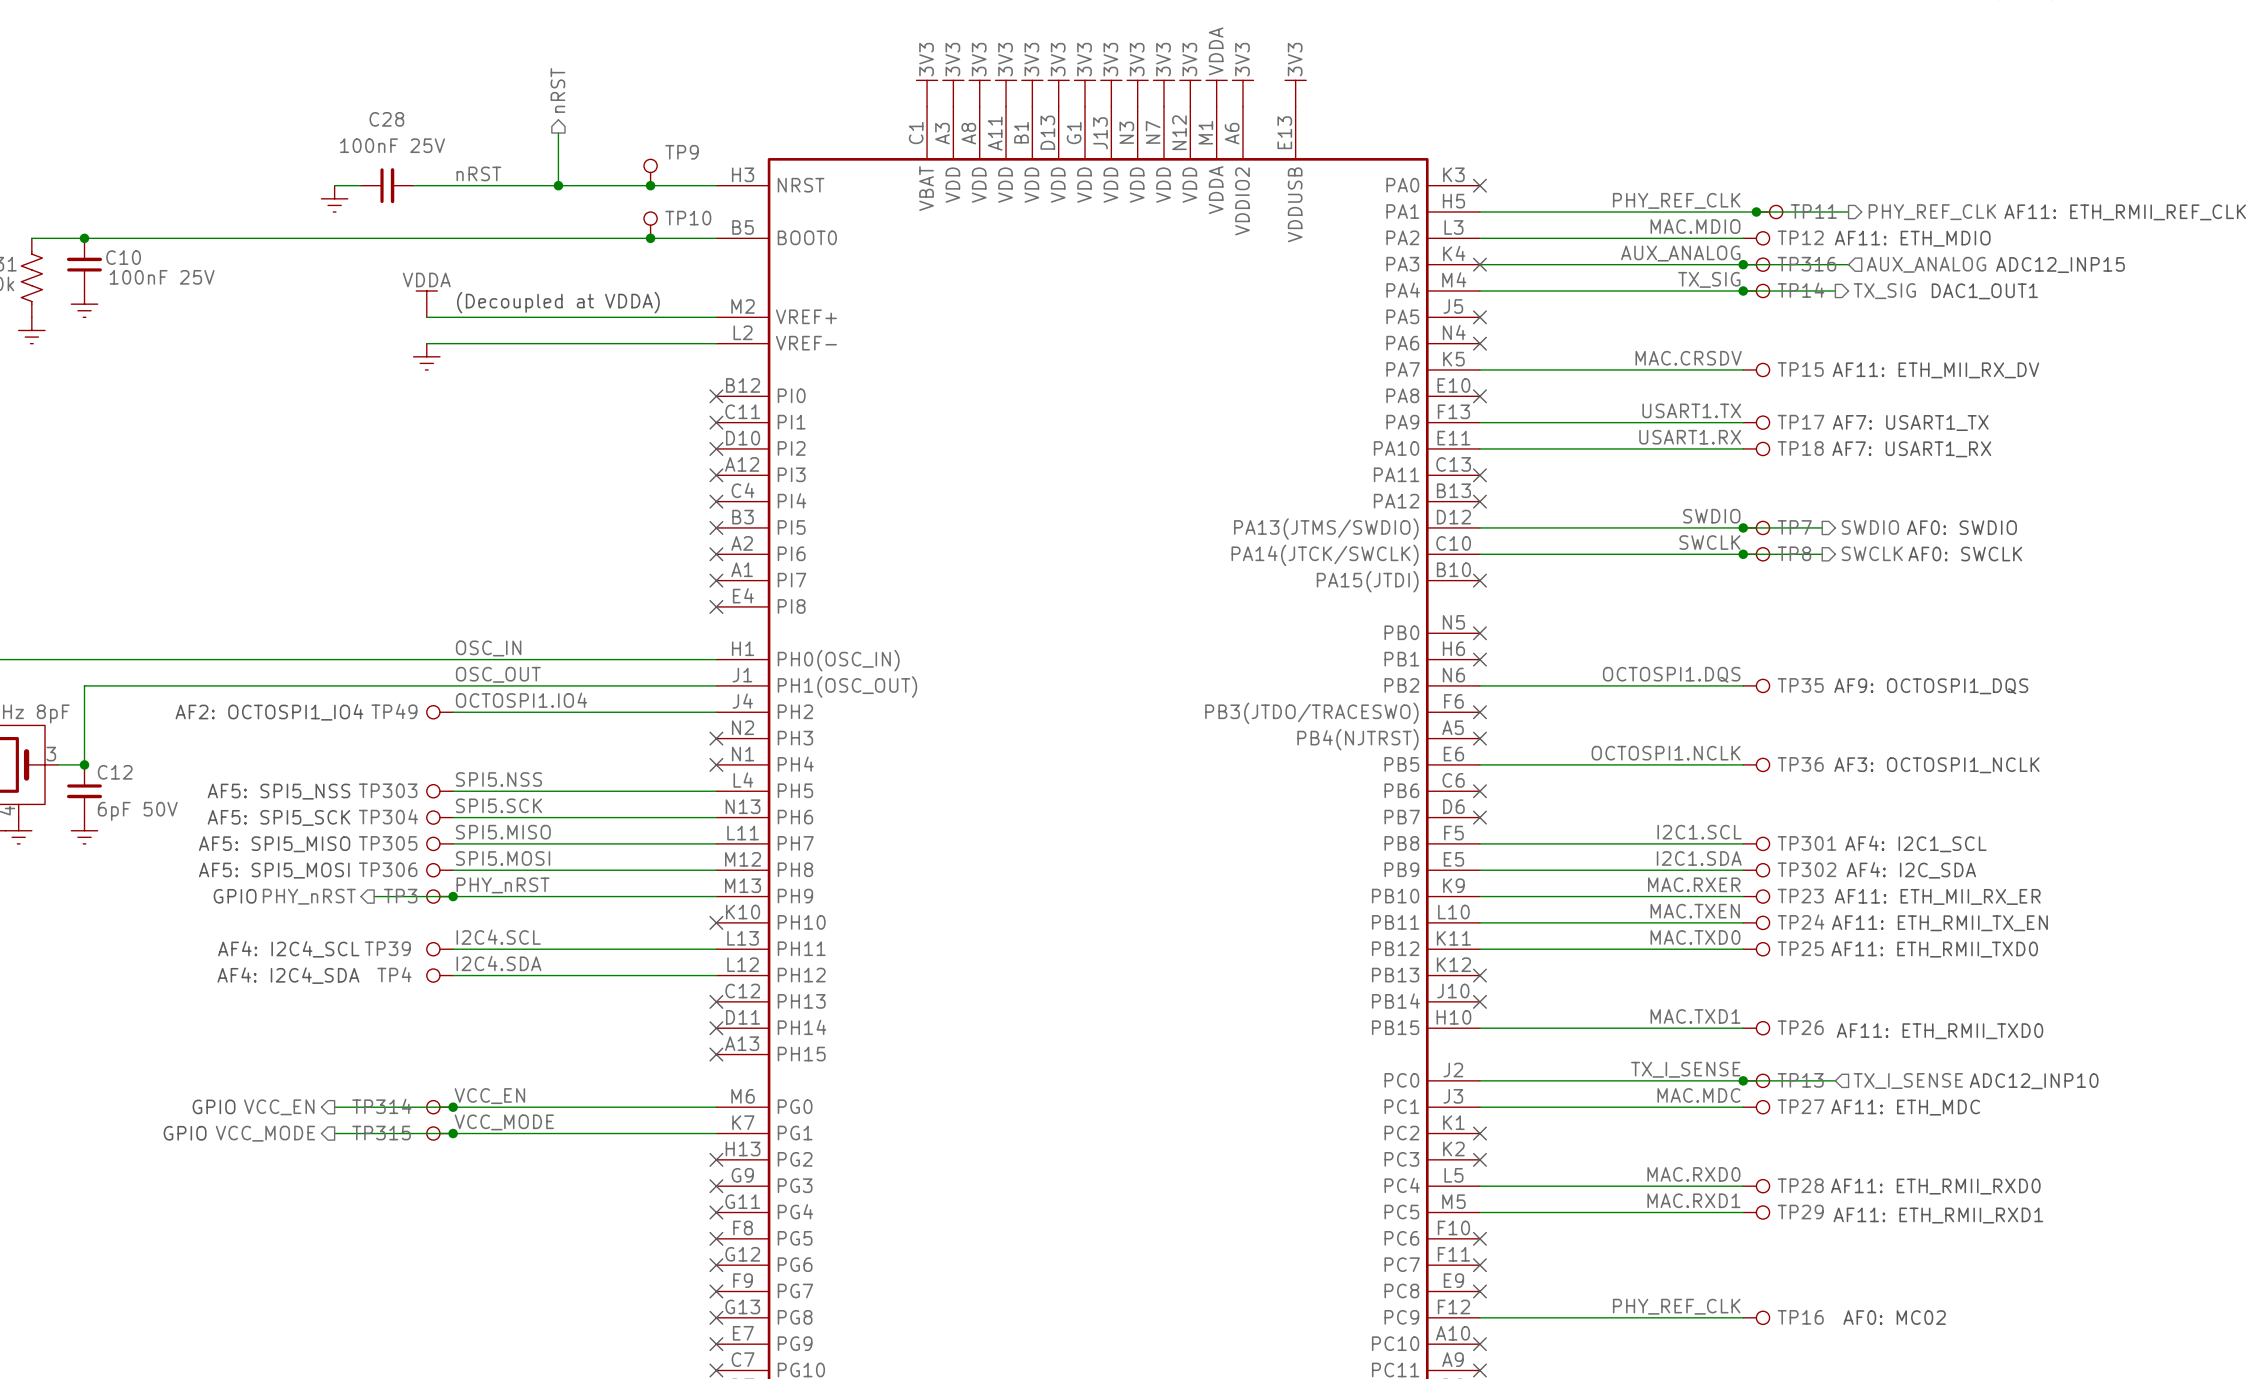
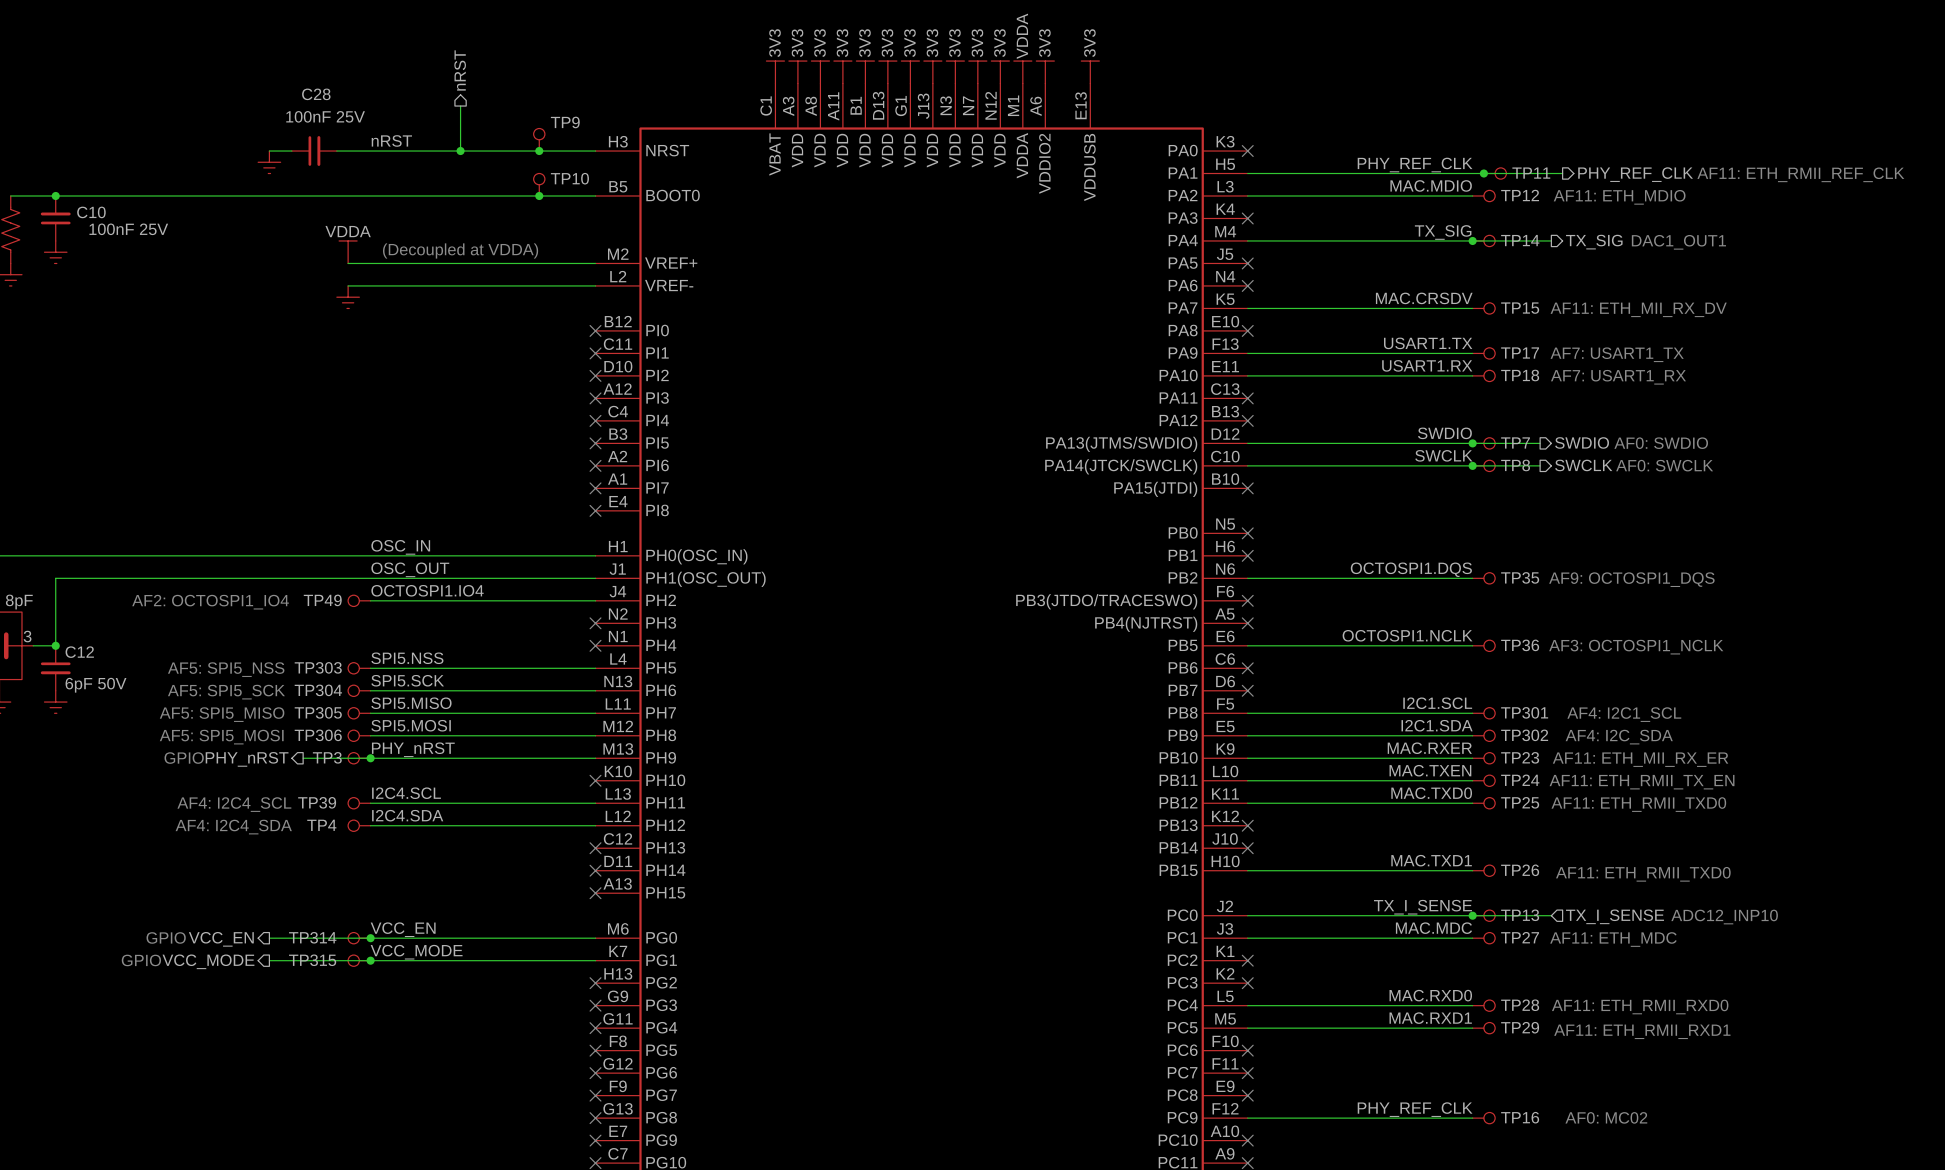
label: AUX_ANALOG (1680, 253) -> none
wire: (1479, 264) (1848, 264) -> none
junction: (1743, 264) -> none
TP316: (1756, 264) -> none
hierarchical label: AUX_ANALOG (1926, 264) -> none
text: ADC12_INP15 (2060, 265) -> none

